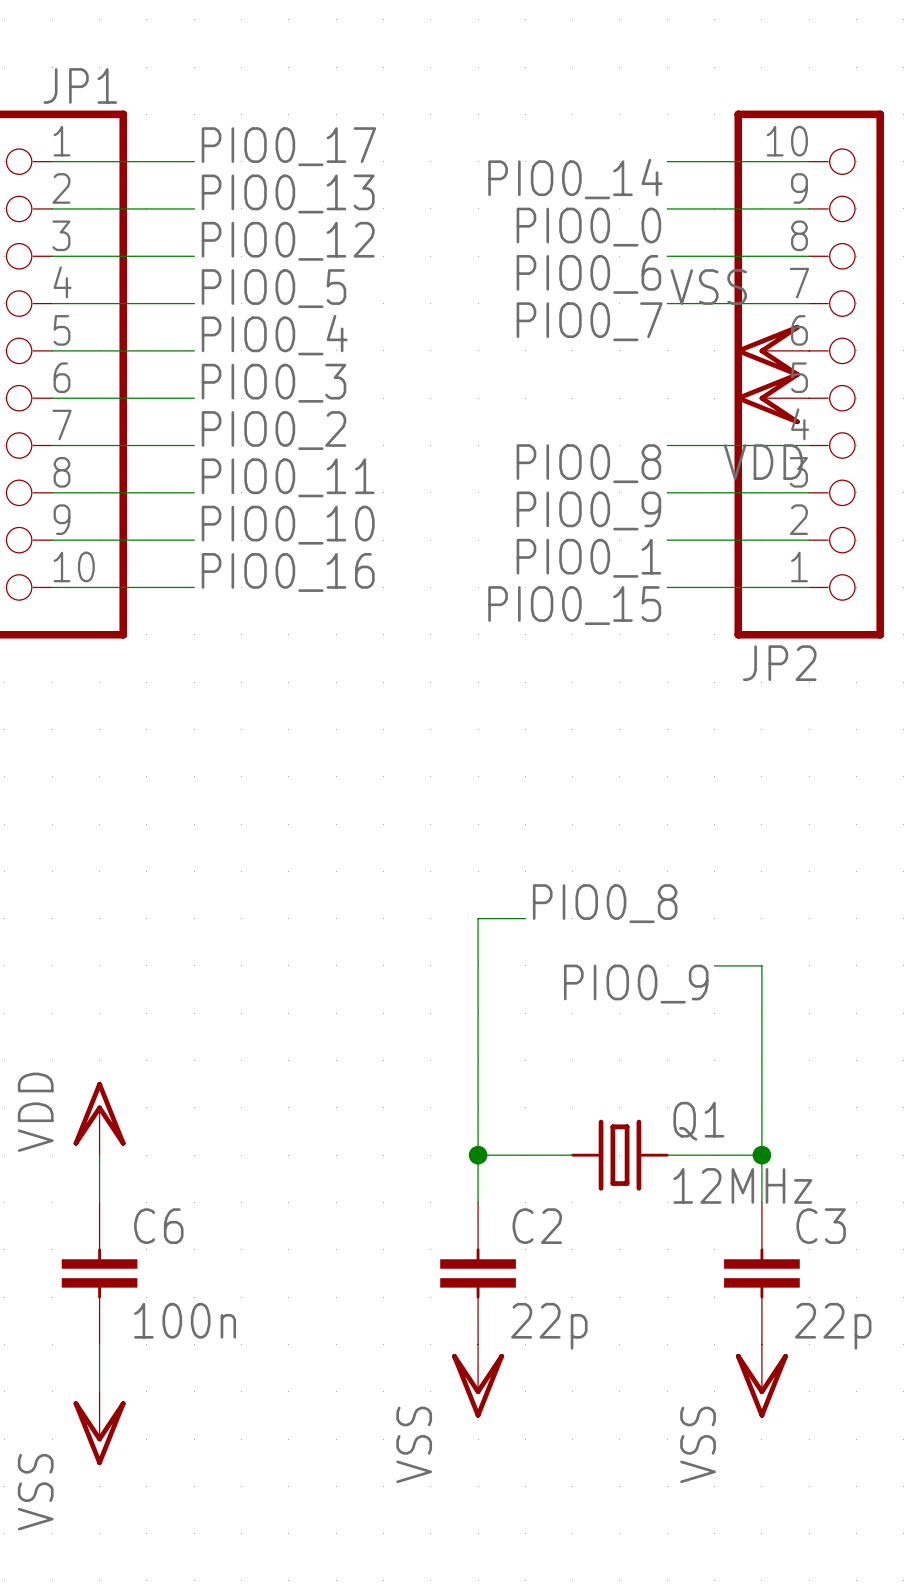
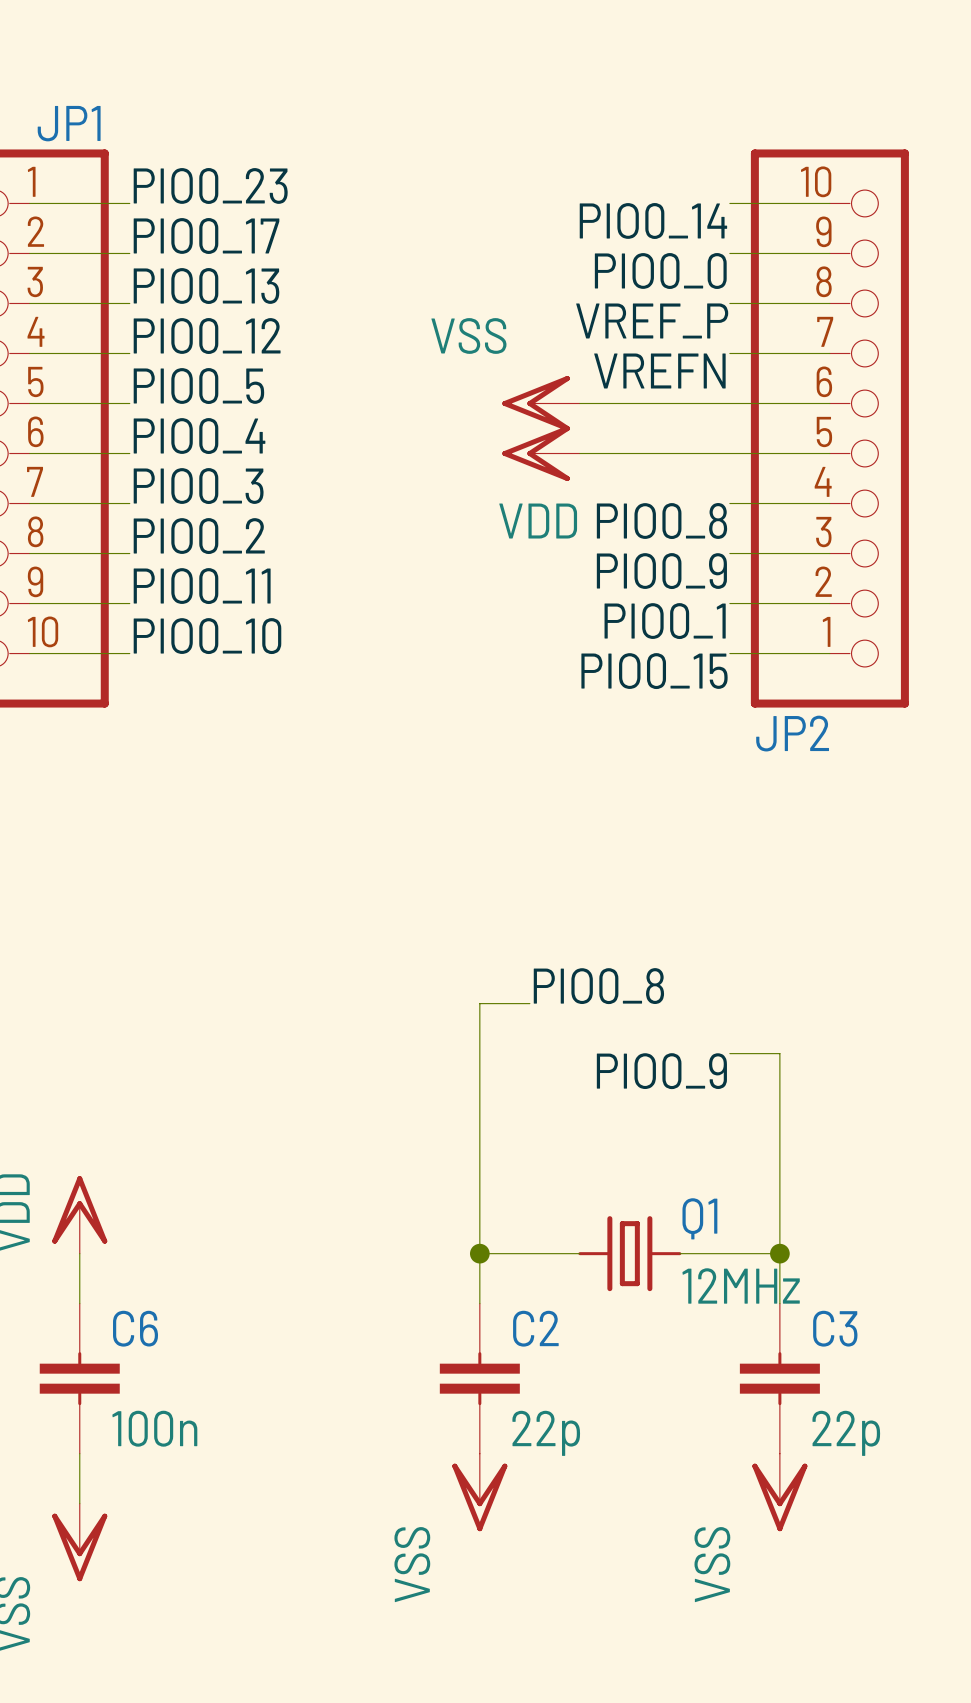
label: none -> PIO0_23 (210, 185)
label position: PIO0_17 (288, 146) -> PIO0_17 (206, 235)
wire: (146, 161) (194, 161) -> none
wire: (667, 161) (714, 161) -> none
label position: PIO0_14 (575, 179) -> PIO0_14 (653, 220)
label position: PIO0_13 (288, 193) -> PIO0_13 (206, 286)
wire: (146, 208) (194, 208) -> none
wire: (667, 208) (714, 208) -> none
label position: PIO0_0 (588, 227) -> PIO0_0 (660, 271)
label position: PIO0_12 (288, 241) -> PIO0_12 (207, 336)
wire: (146, 256) (194, 256) -> none
wire: (667, 256) (714, 256) -> none
label: PIO0_6 (588, 274) -> none
label: none -> VREF_P (652, 320)
label position: PIO0_5 (274, 288) -> PIO0_5 (198, 386)
wire: (146, 303) (194, 303) -> none
wire: (667, 303) (714, 303) -> none
label: none -> VREFN (659, 370)
label: PIO0_7 (589, 321) -> none
label position: PIO0_4 (274, 335) -> PIO0_4 (199, 436)
wire: (146, 350) (194, 350) -> none
wire: none -> (579, 403) (829, 403)
power symbol position: VSS (772, 350) -> VSS (541, 403)
label position: PIO0_3 (274, 383) -> PIO0_3 (198, 486)
wire: (146, 398) (194, 398) -> none
wire: none -> (579, 453) (829, 453)
power symbol position: VDD (772, 398) -> VDD (541, 453)
label position: PIO0_2 (274, 430) -> PIO0_2 (199, 536)
wire: (146, 445) (194, 445) -> none
wire: (667, 445) (714, 445) -> none
label position: PIO0_8 (588, 463) -> PIO0_8 (661, 521)
label position: PIO0_11 (288, 477) -> PIO0_11 (202, 586)
wire: (146, 492) (194, 492) -> none
wire: (667, 492) (714, 492) -> none
label position: PIO0_9 (588, 510) -> PIO0_9 (661, 571)
label position: PIO0_10 (288, 525) -> PIO0_10 (207, 636)
wire: (146, 540) (194, 540) -> none
wire: (667, 540) (714, 540) -> none
label position: PIO0_1 (588, 558) -> PIO0_1 (665, 621)
label: PIO0_16 (288, 572) -> none
wire: (146, 587) (194, 587) -> none
wire: (667, 587) (714, 587) -> none
label position: PIO0_15 (574, 605) -> PIO0_15 (654, 671)

